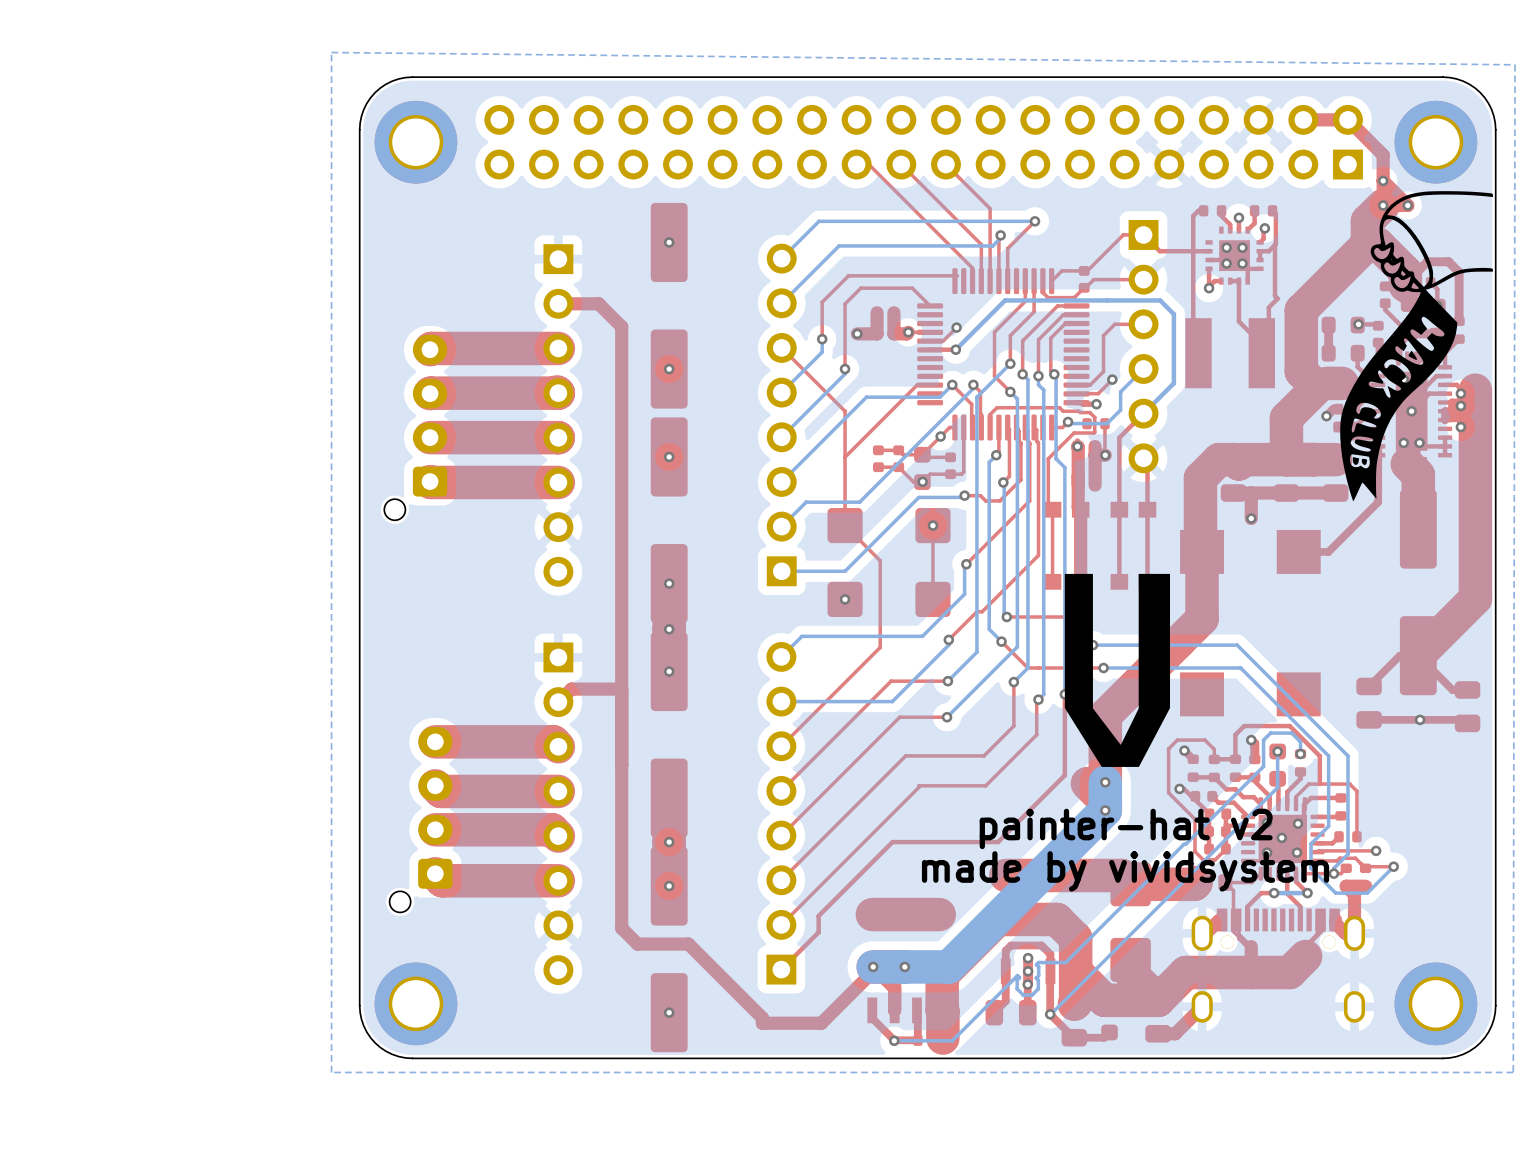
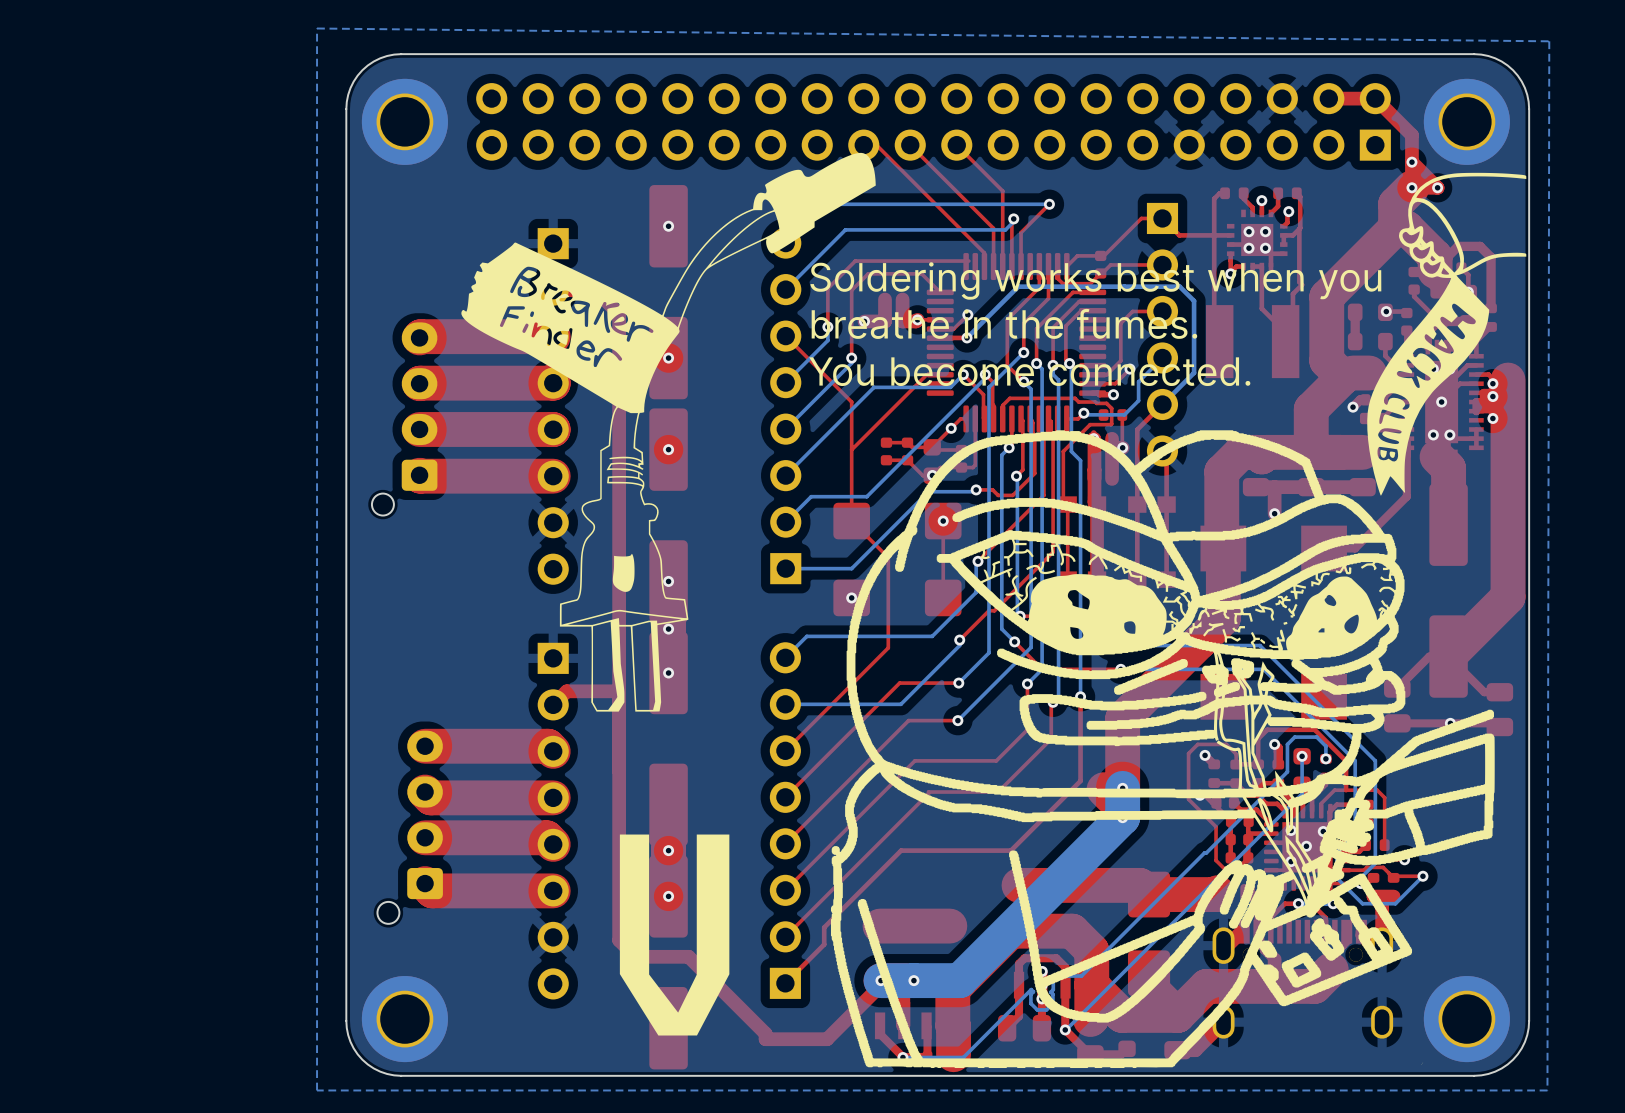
drawing: none -> [461, 152, 876, 712]
drawing shape: [1064, 573, 1170, 767] -> [809, 262, 1495, 1069]
drawing: none -> [619, 834, 730, 1036]
text: painter-hat v2 (1126, 828) -> none
text: made by vividsystem (1125, 871) -> none

